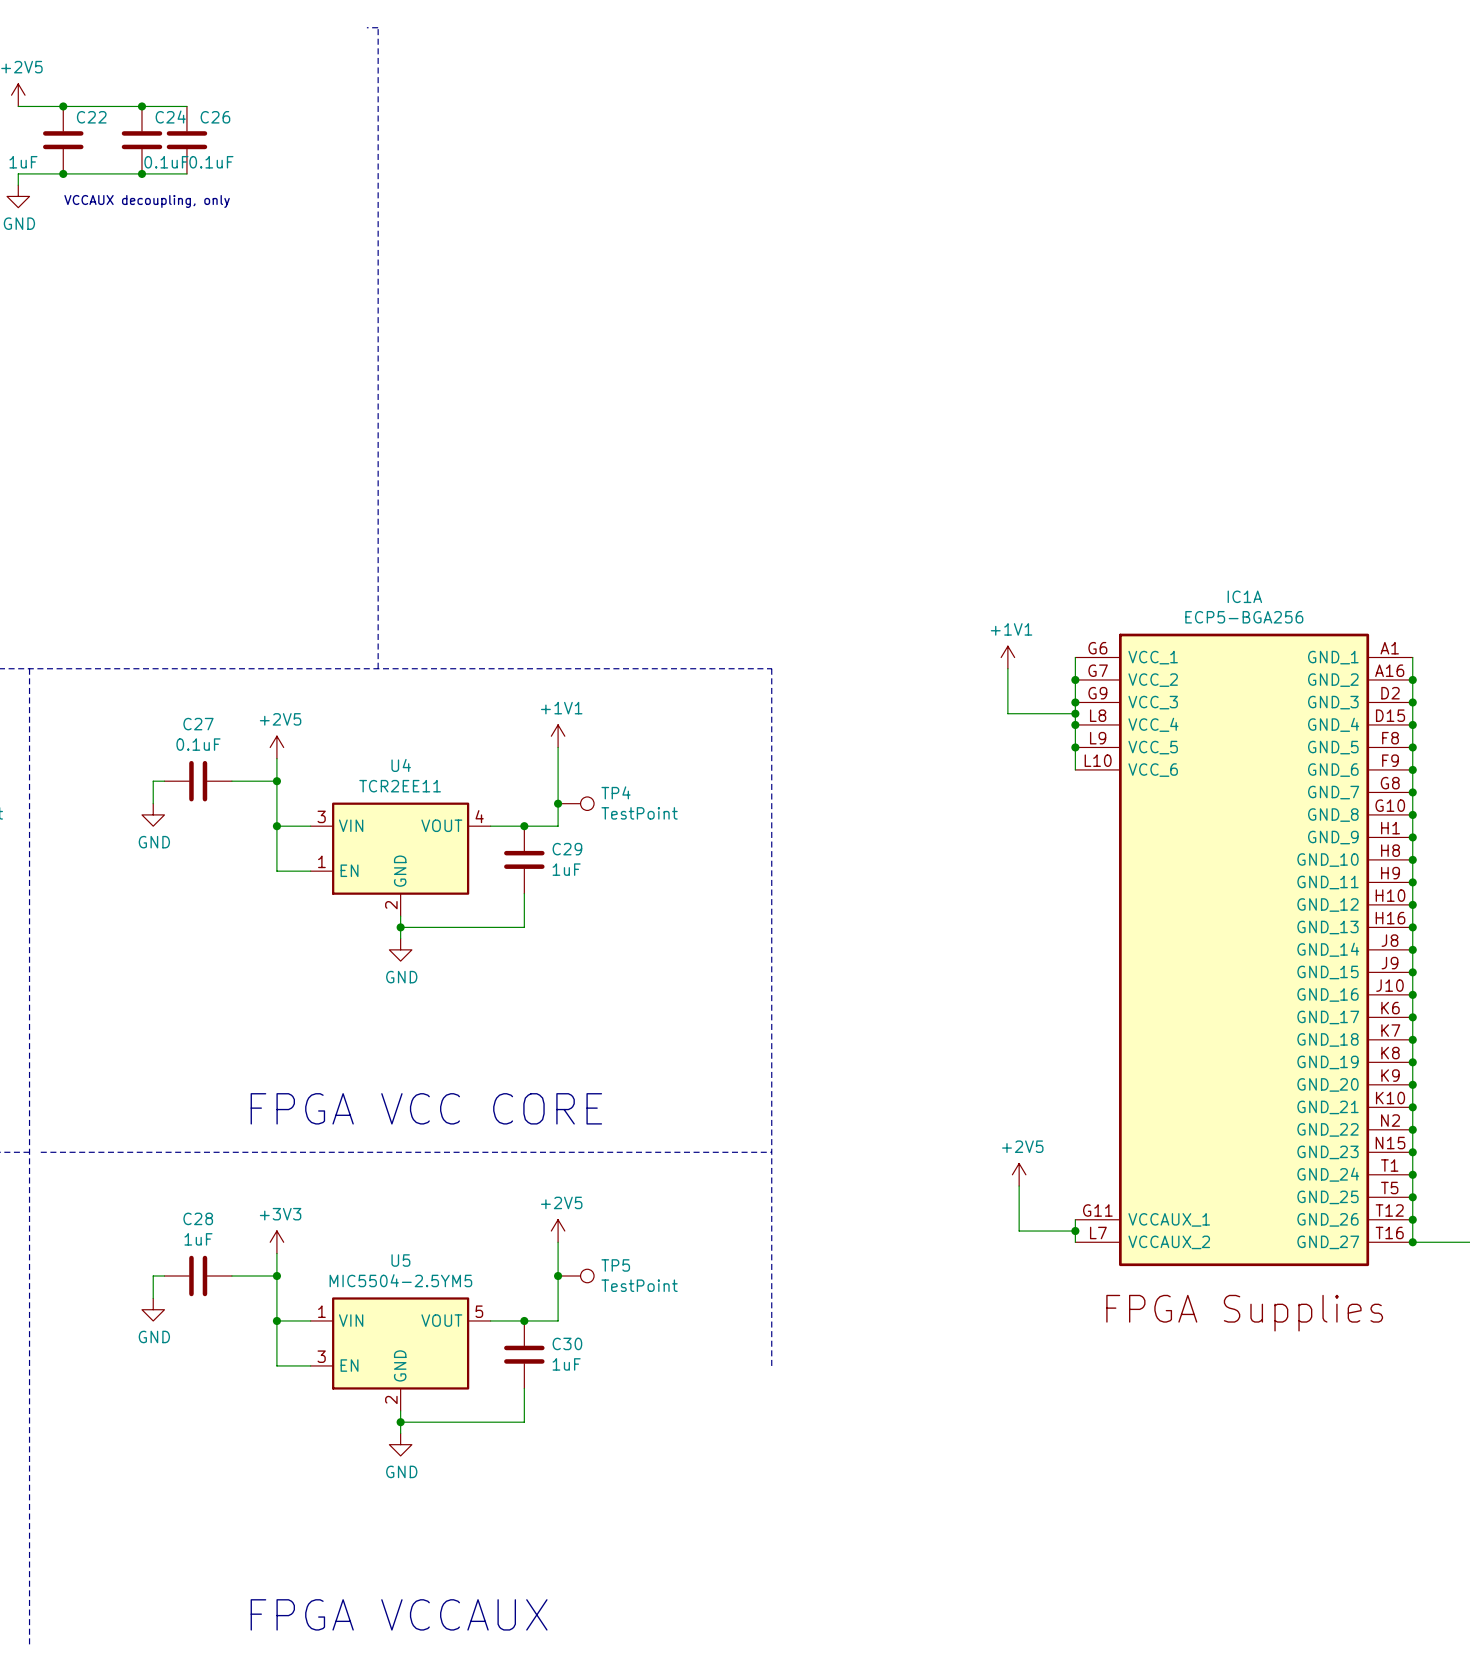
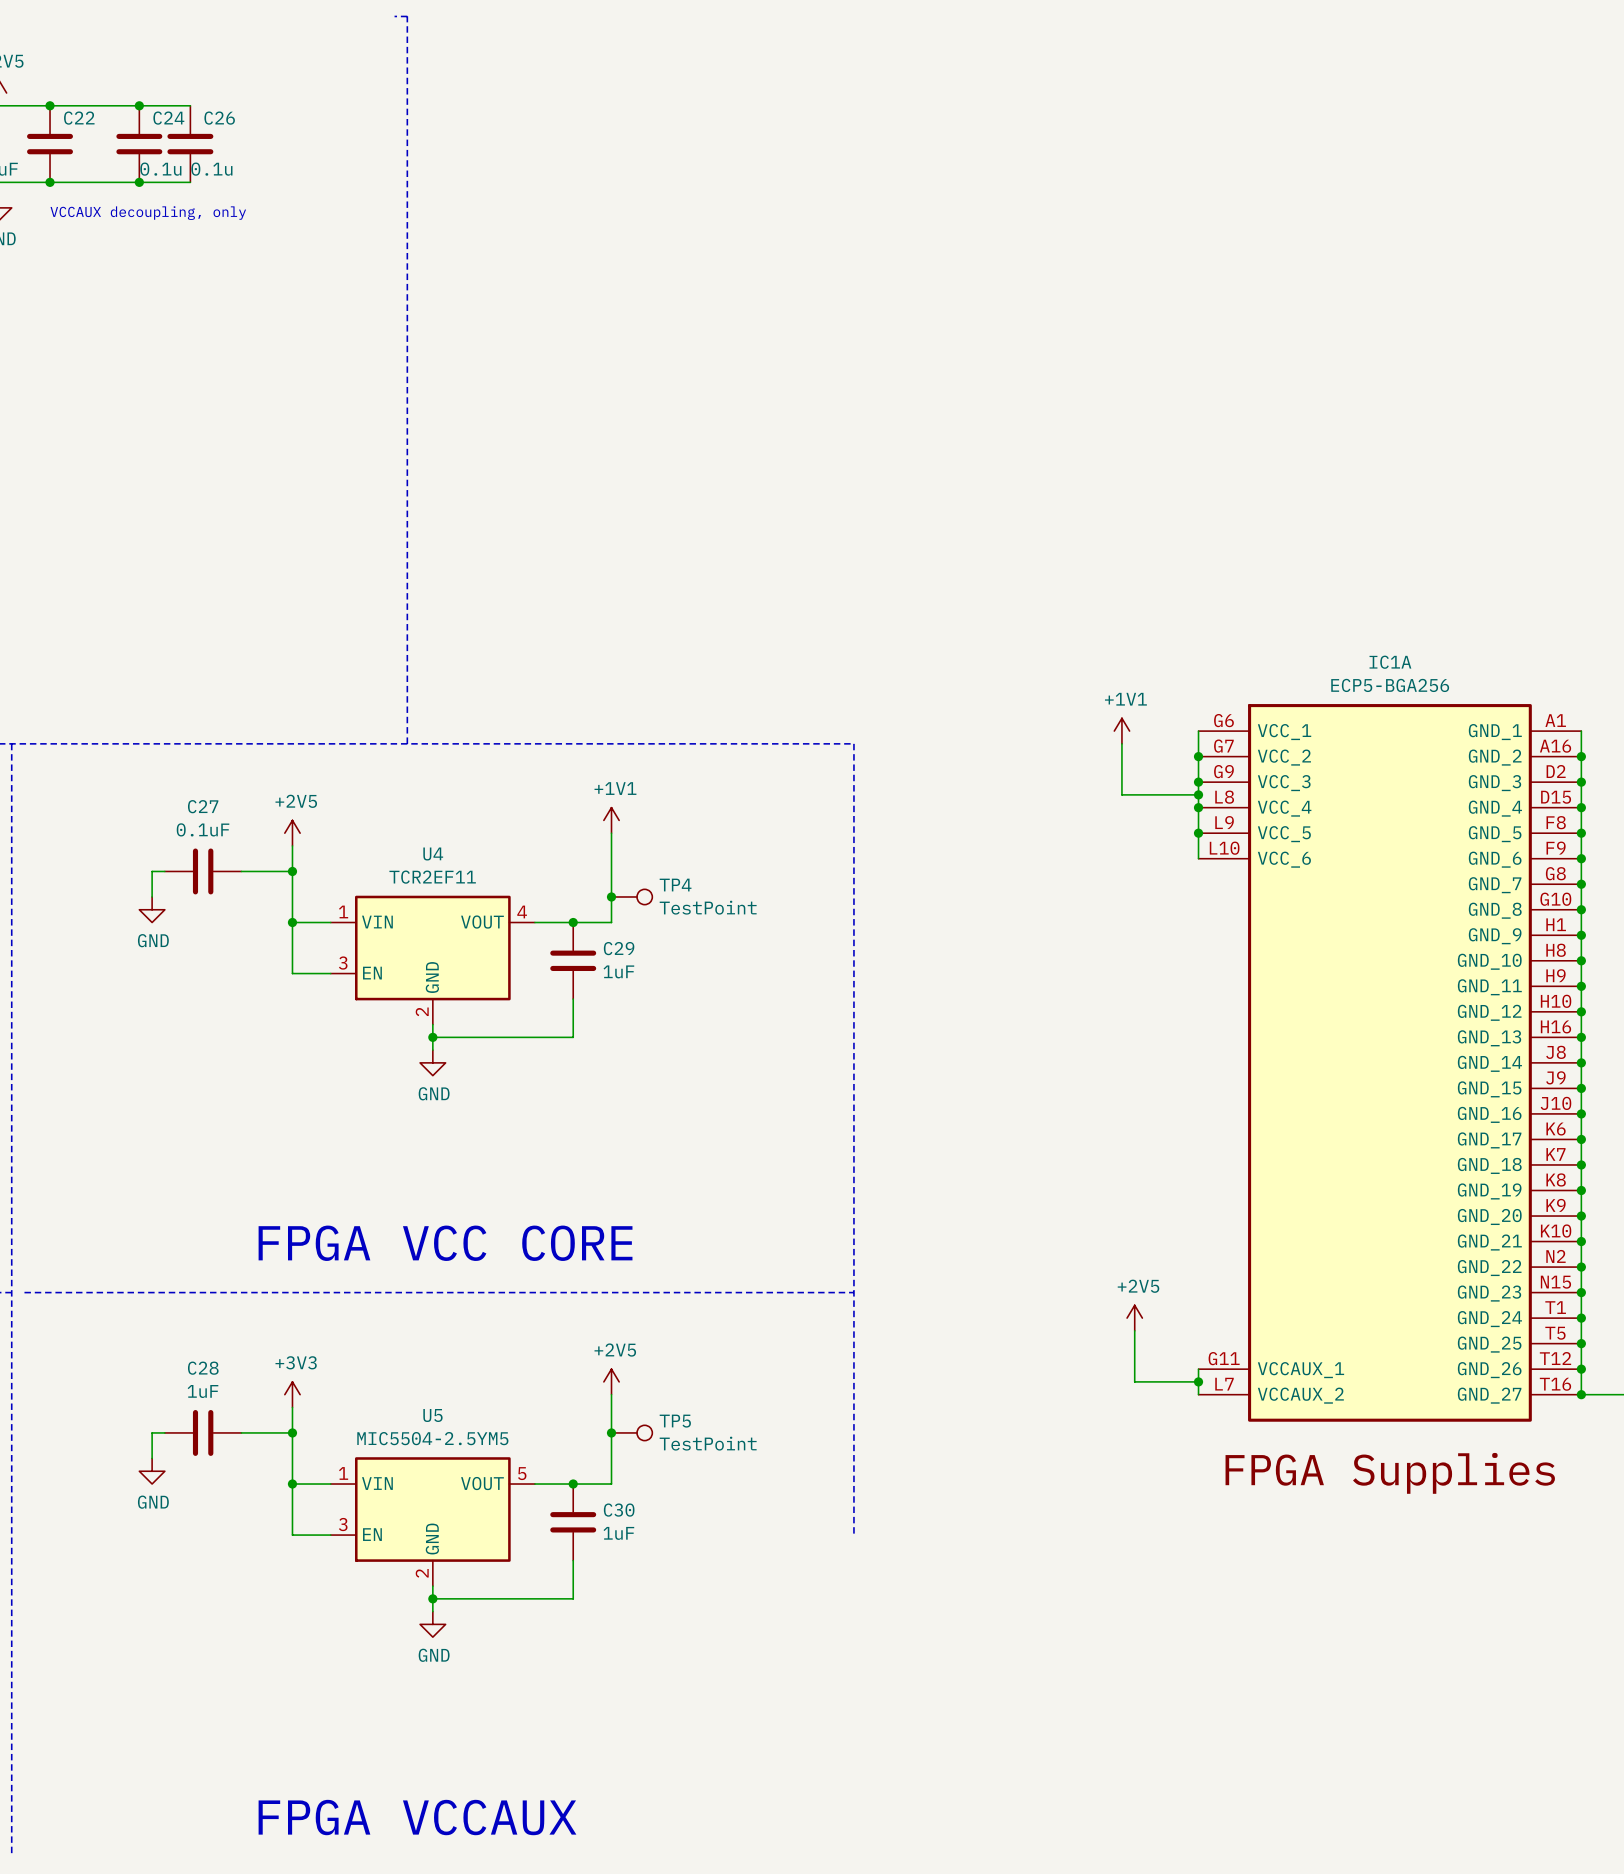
C24 value: 0.1uF (166, 162) -> 0.1u (160, 169)
C26 value: 0.1uF (211, 162) -> 0.1u (211, 169)
U4 value: TCR2EE11 (400, 786) -> TCR2EF11 (432, 877)
U4 pin number: 3 (321, 816) -> 1 (343, 911)
U4 pin number: 1 (321, 861) -> 3 (343, 963)

